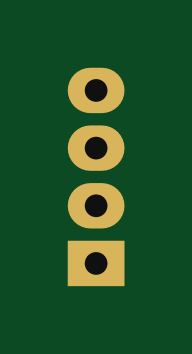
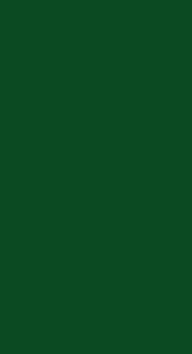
part: (96, 176) -> none

